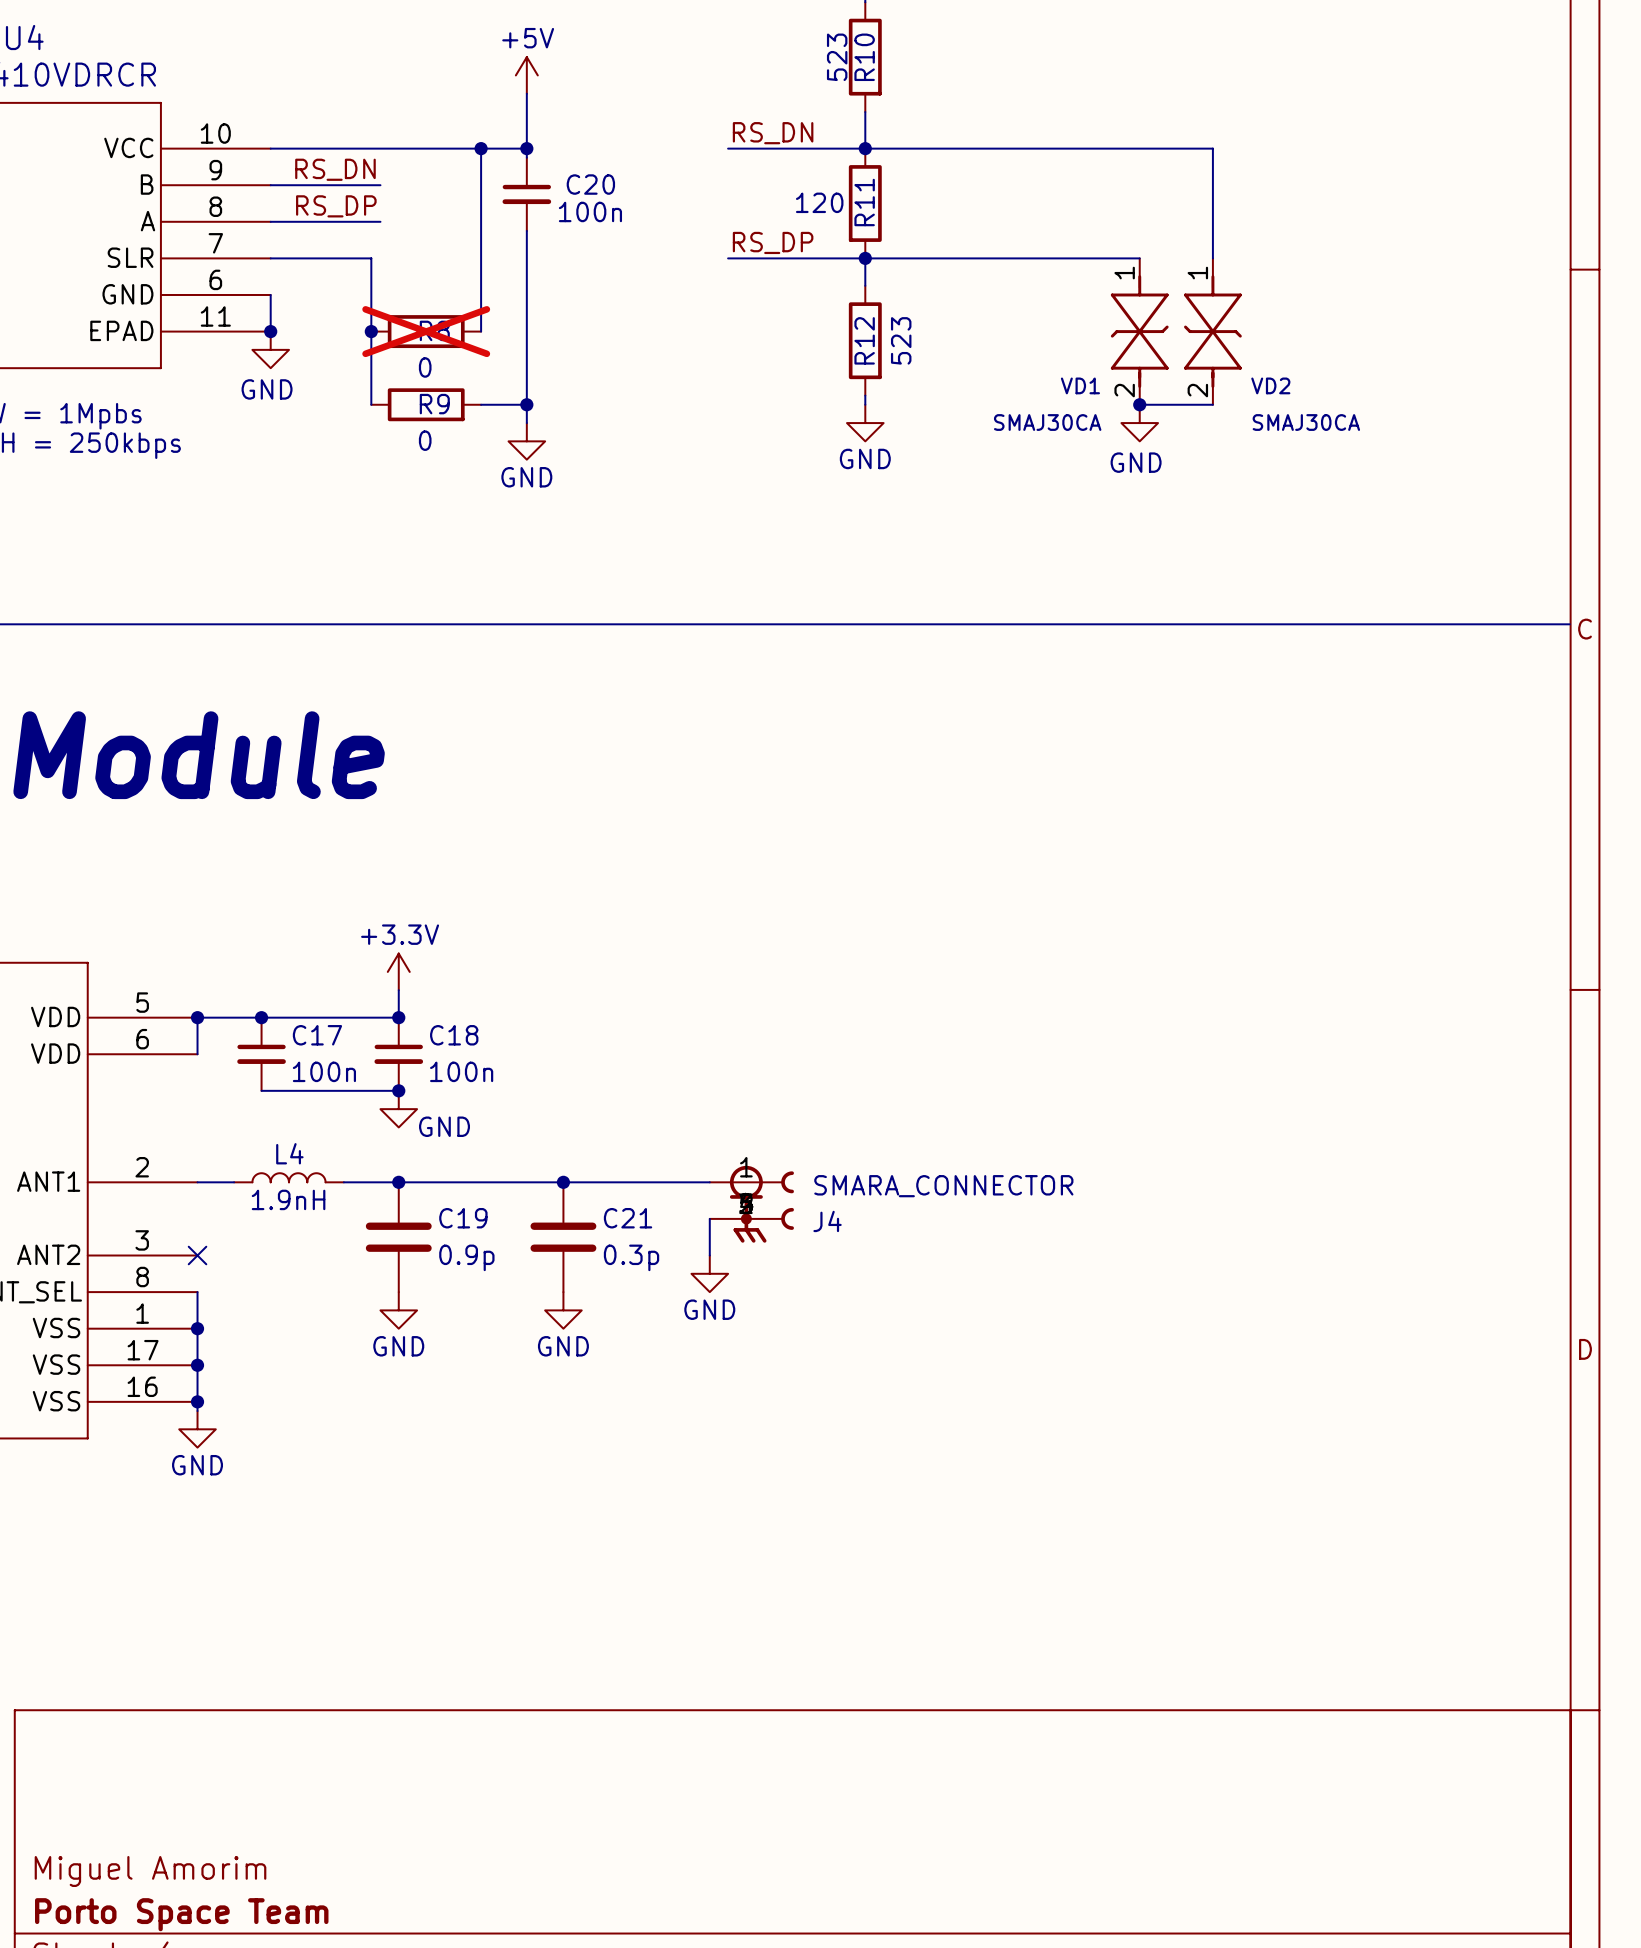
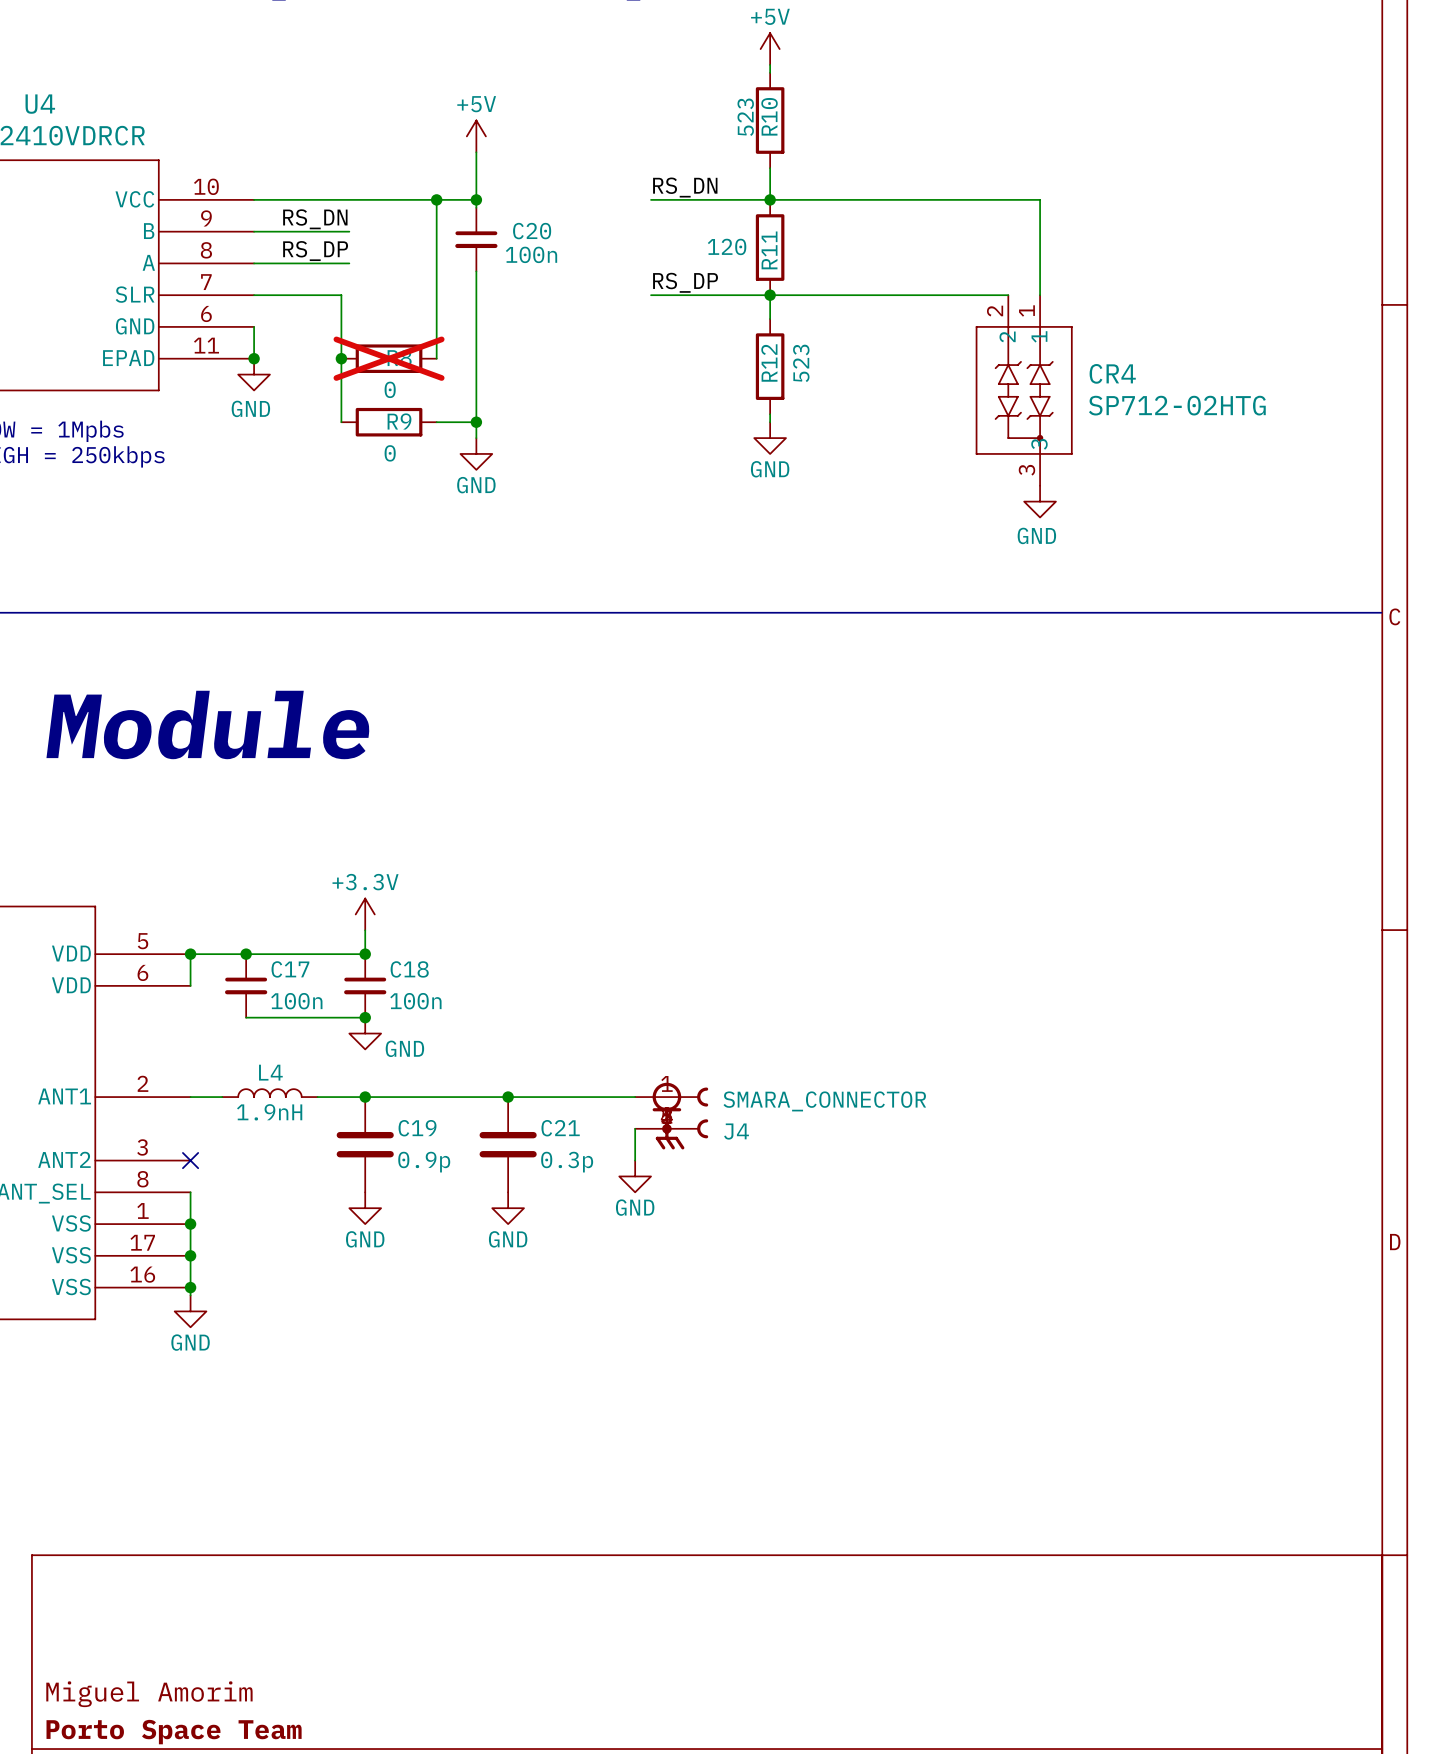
wire: (1176, 148) (1212, 148) (1212, 258) -> (1040, 199) (1040, 295)
VD1: SMAJ30CA (1139, 331) -> none
VD2: SMAJ30CA (1212, 331) -> none
CR4: none -> SP712-02HTG (1024, 390)
wire: (1139, 404) (1212, 404) -> none
junction: (1139, 404) -> none
power symbol position: GND (1139, 423) -> GND (1040, 501)

